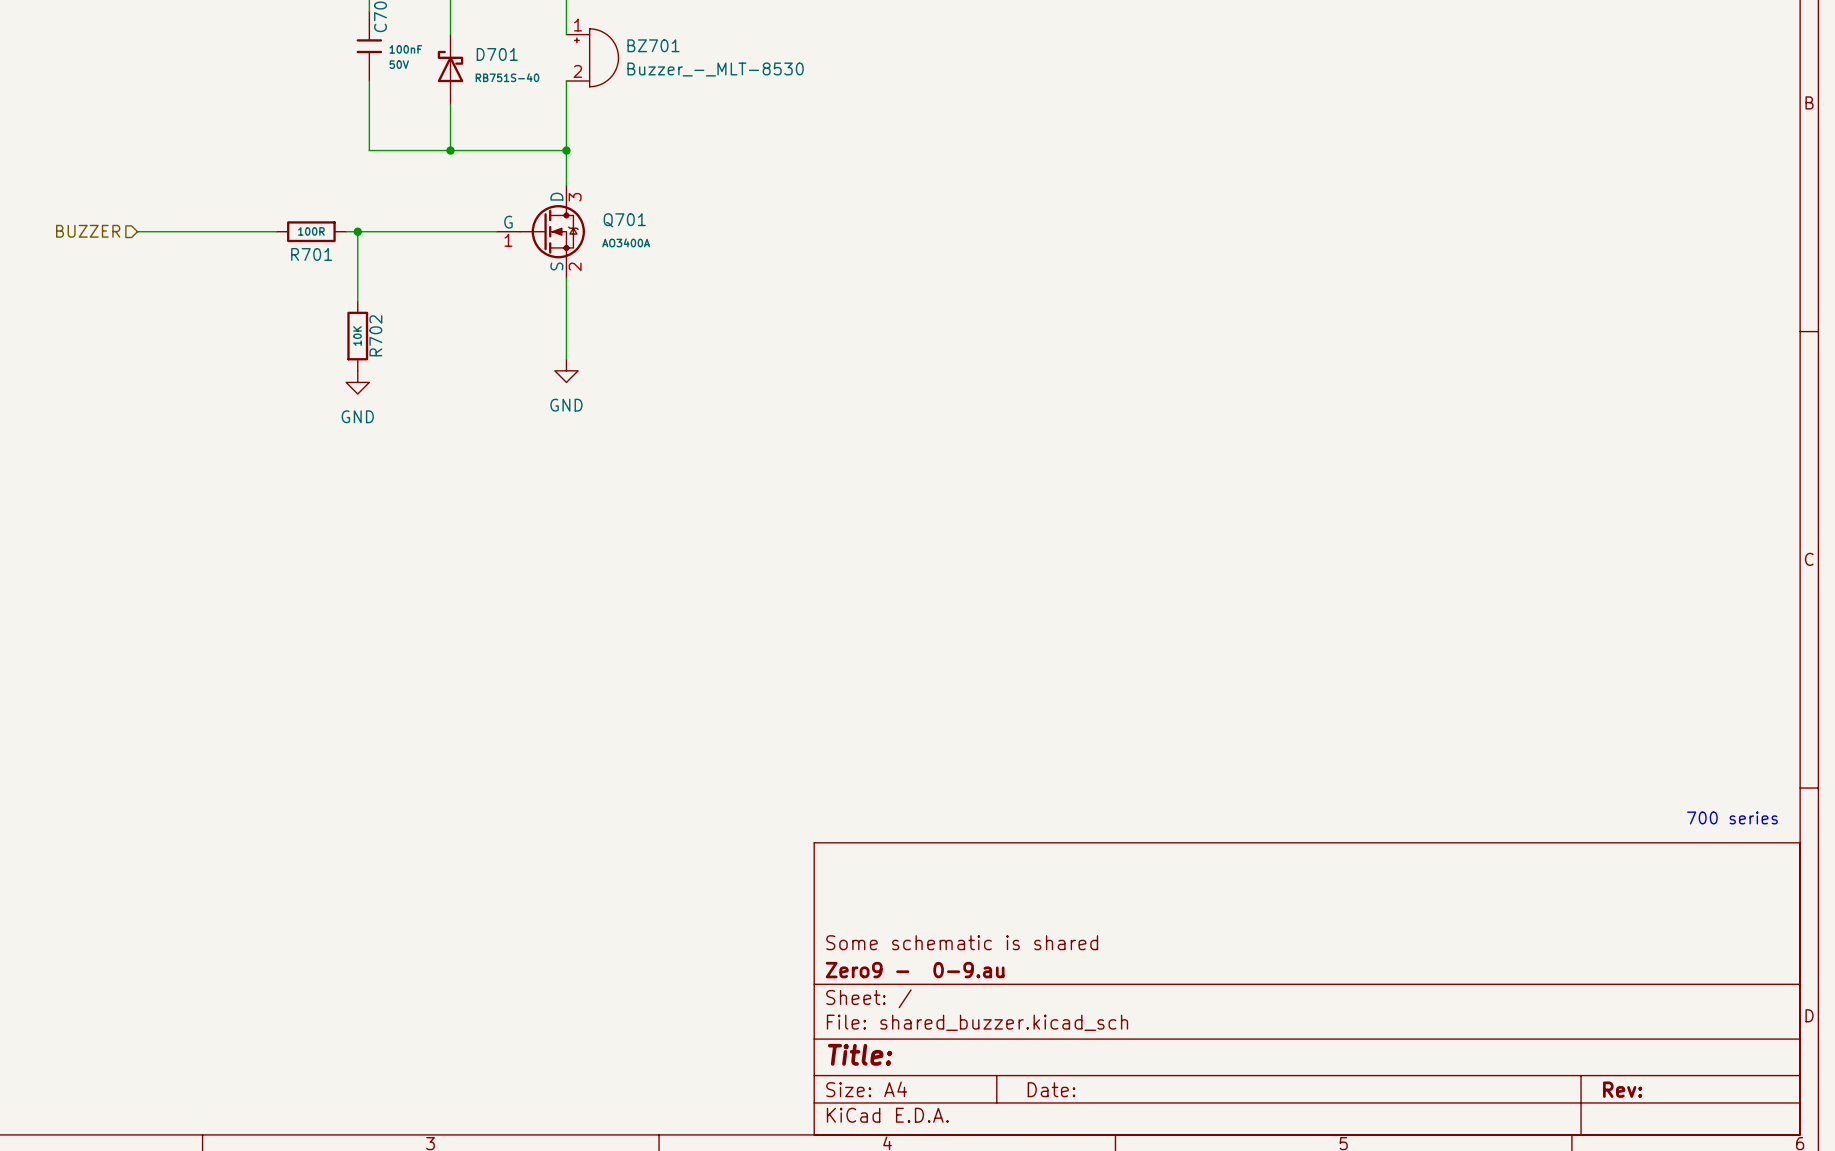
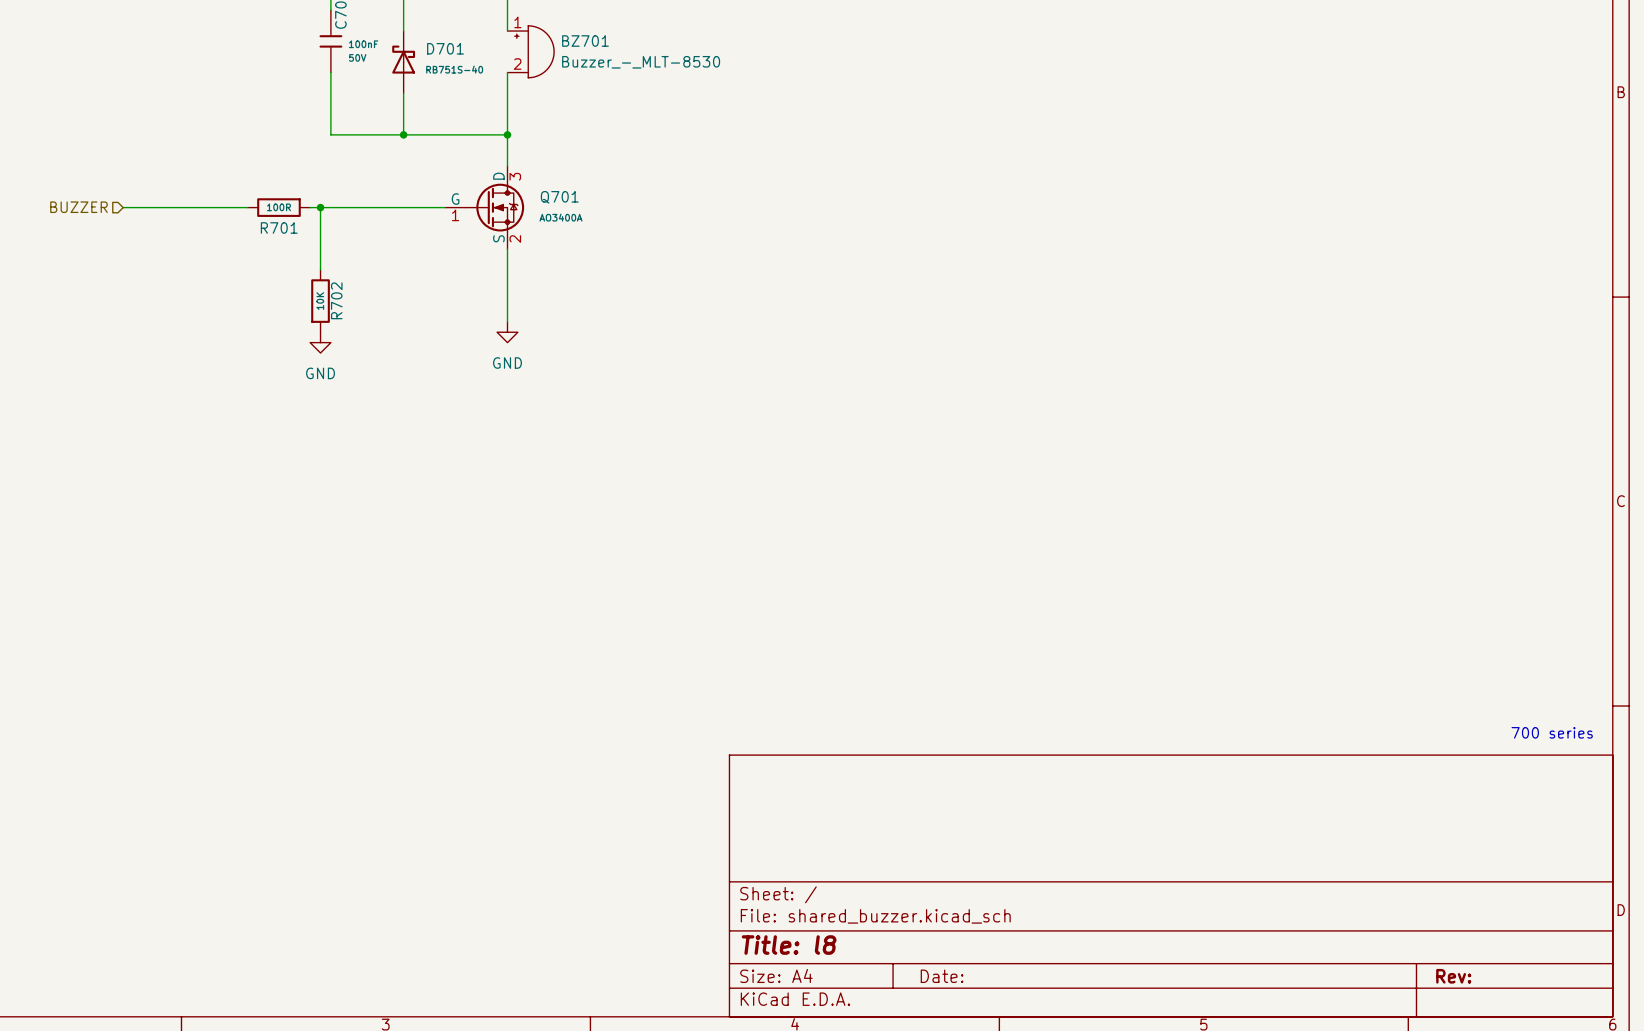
title block: Some schematic is shared (962, 942) -> none
title block: Zero9 - 0-9.au (915, 970) -> none
title block: Title: (860, 1054) -> Title: l8 (789, 945)

